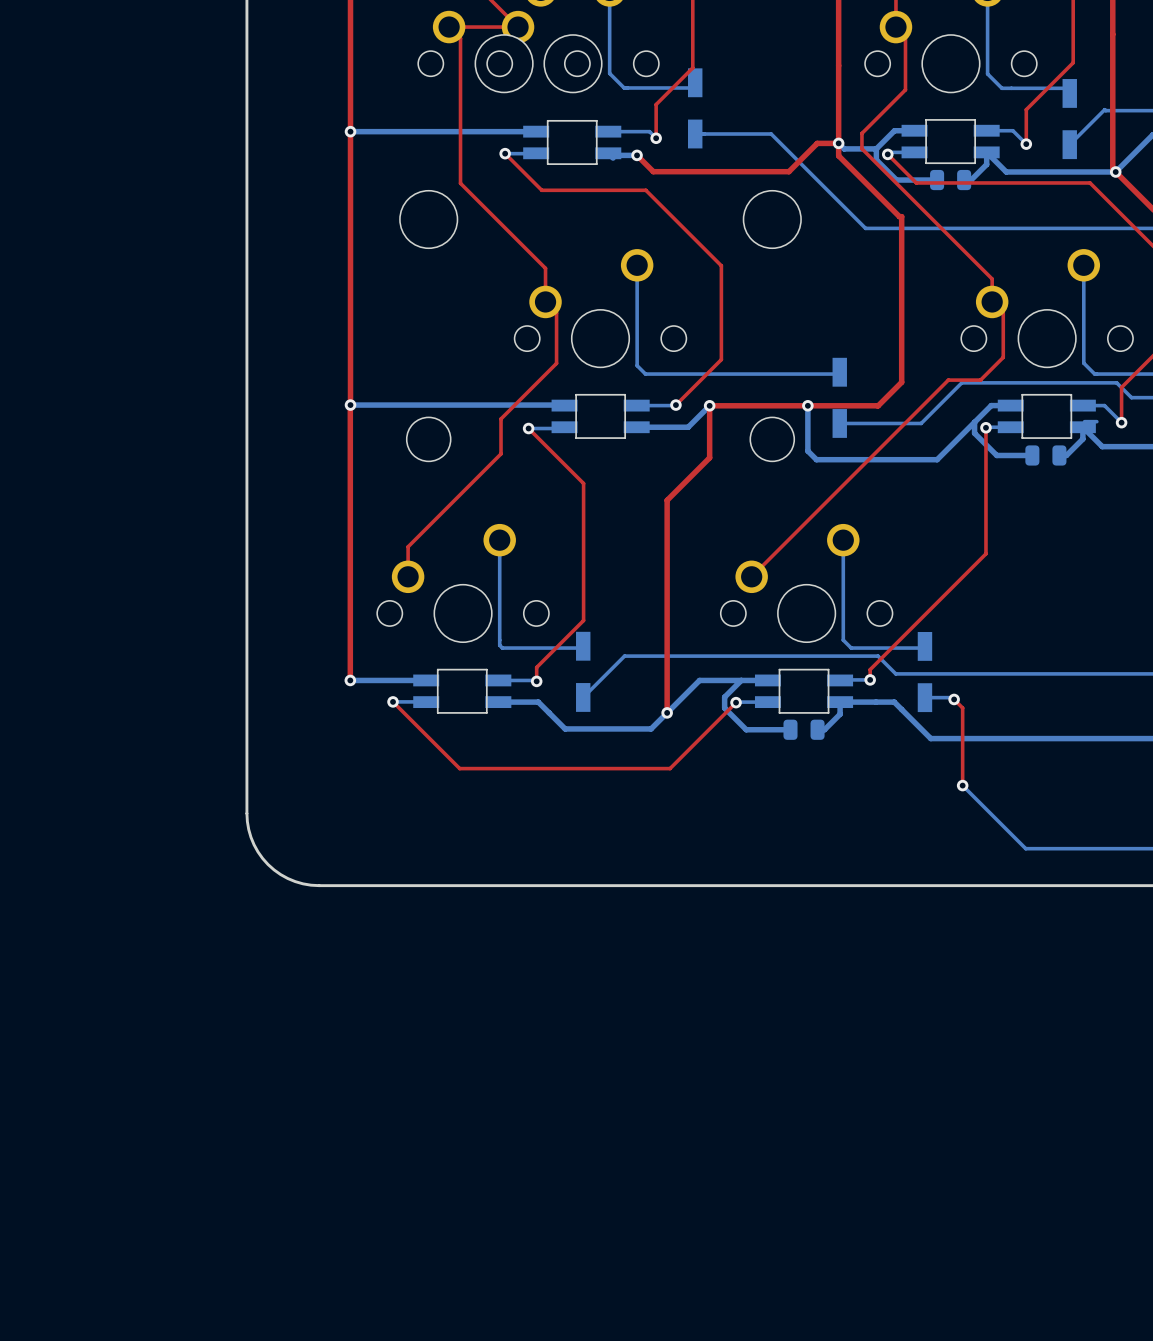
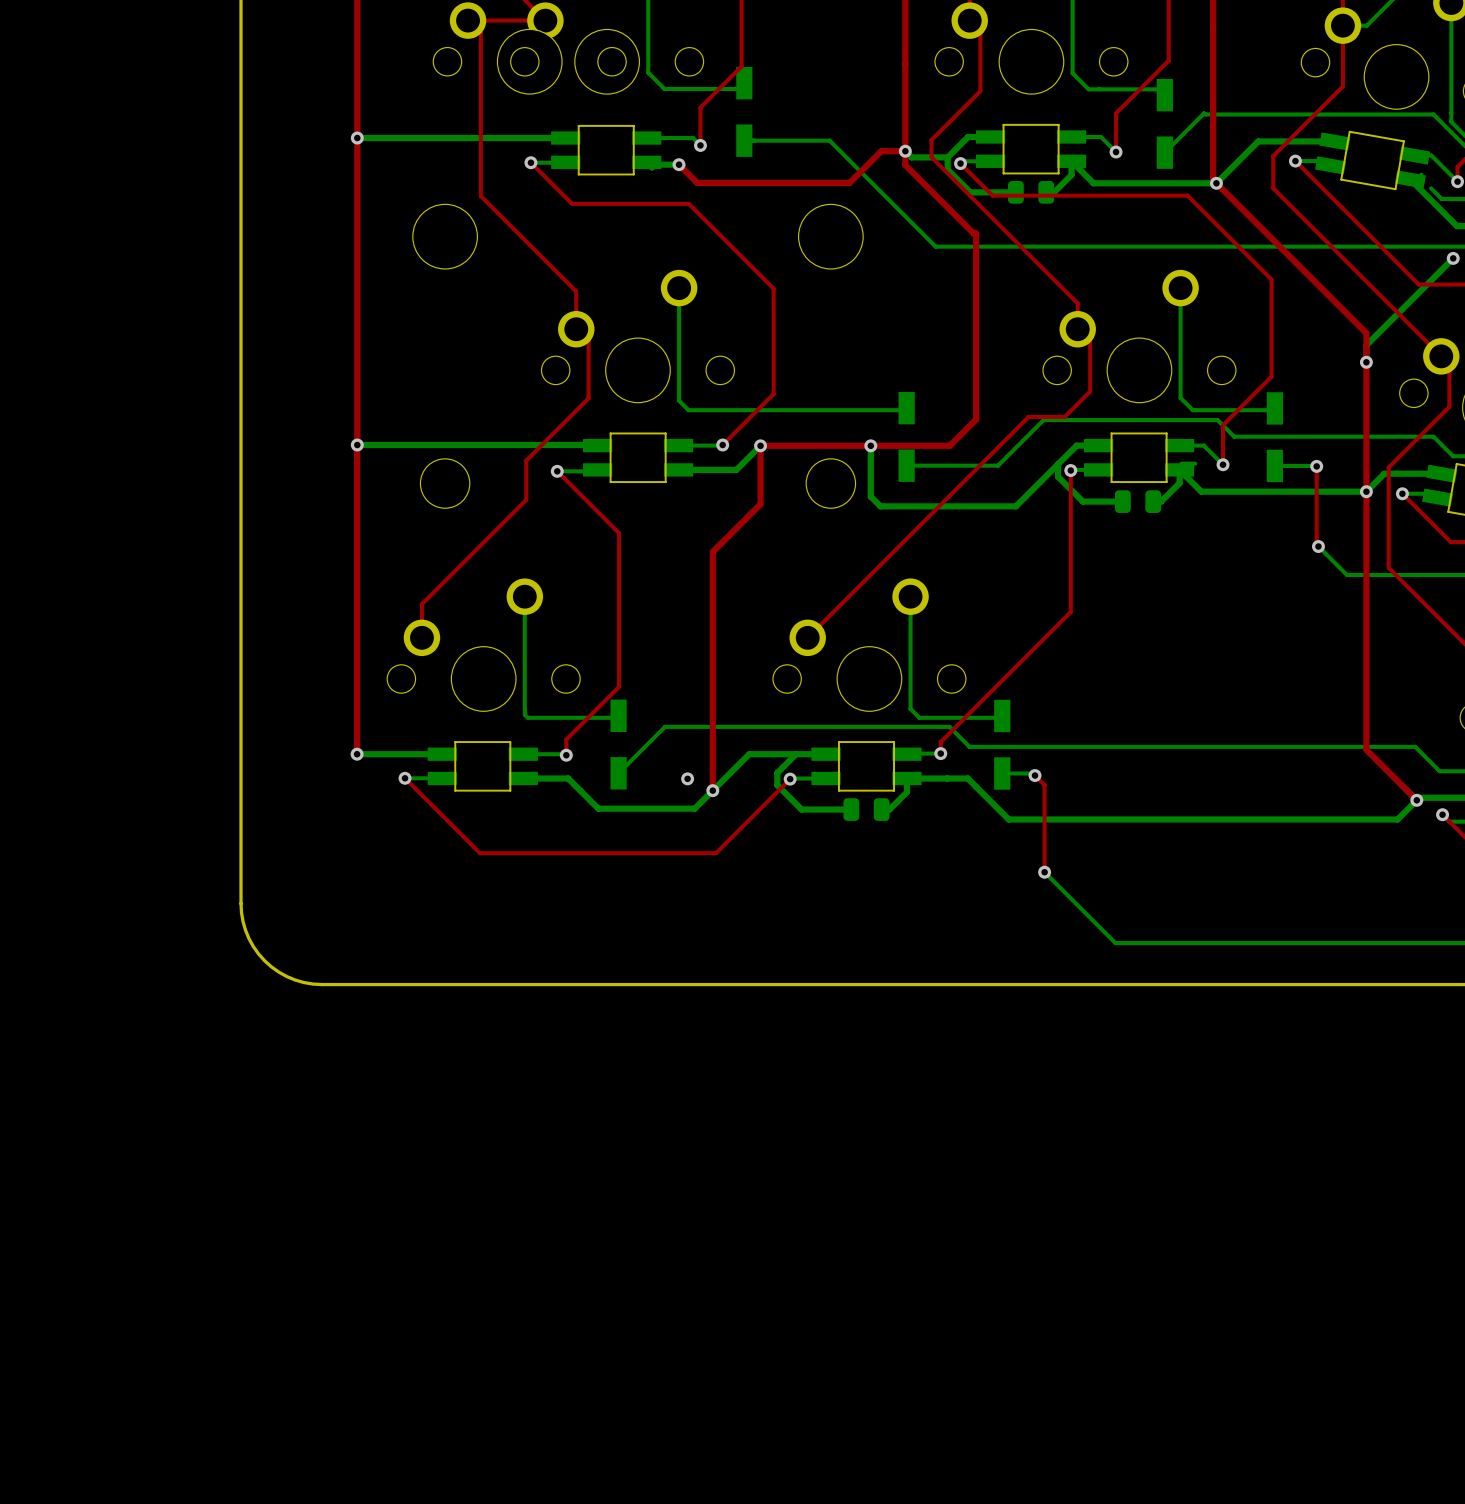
via: none -> (687, 778)

